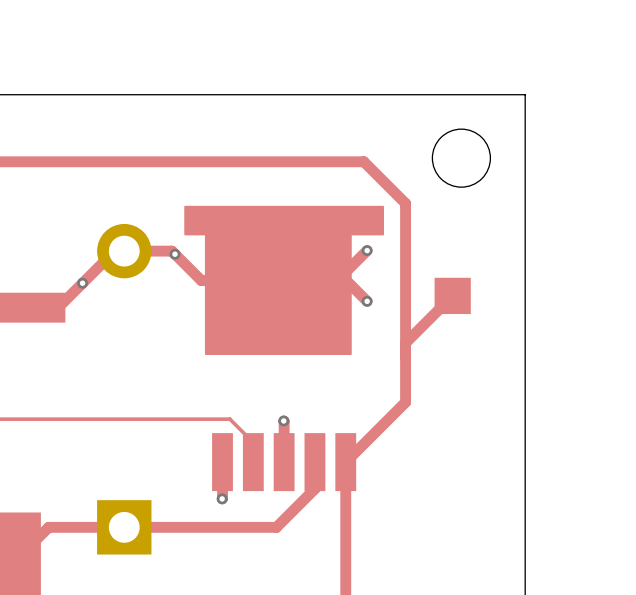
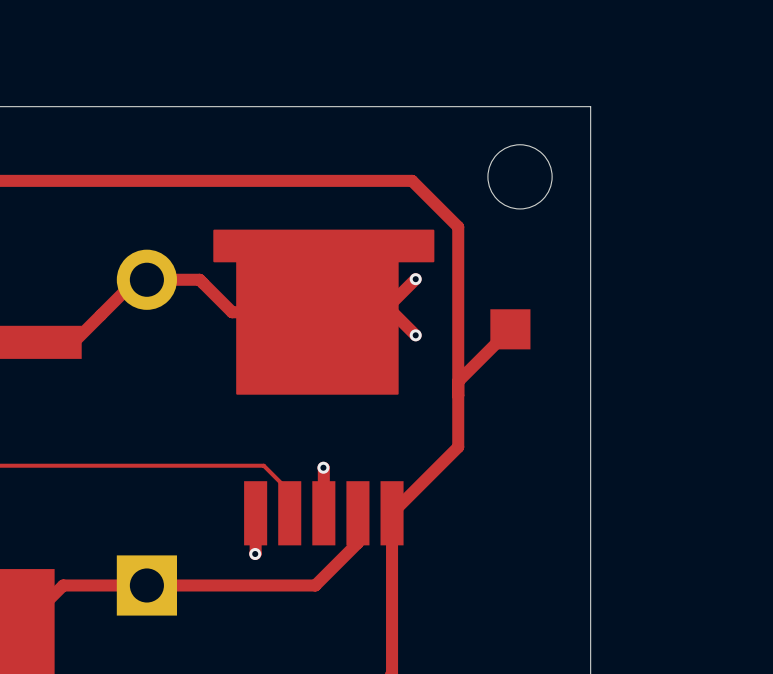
via: (175, 254) -> none
via: (82, 283) -> none

